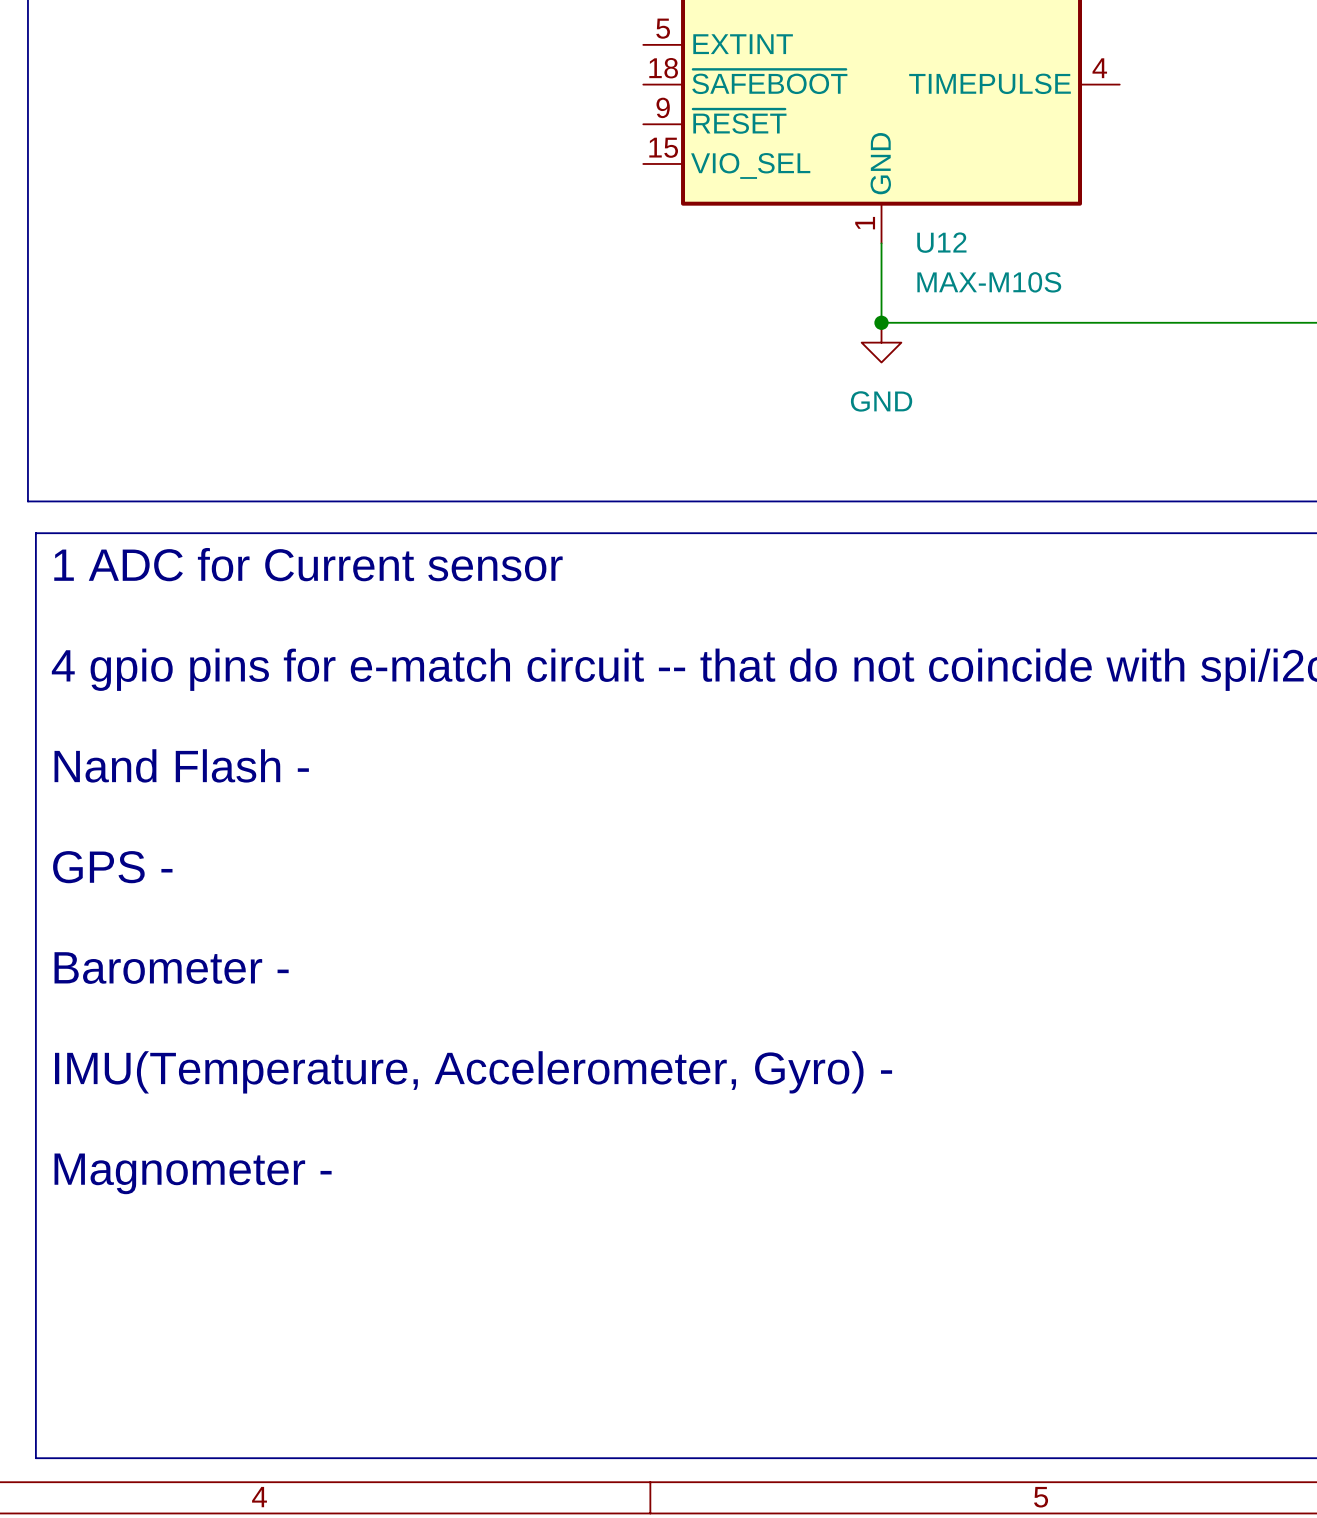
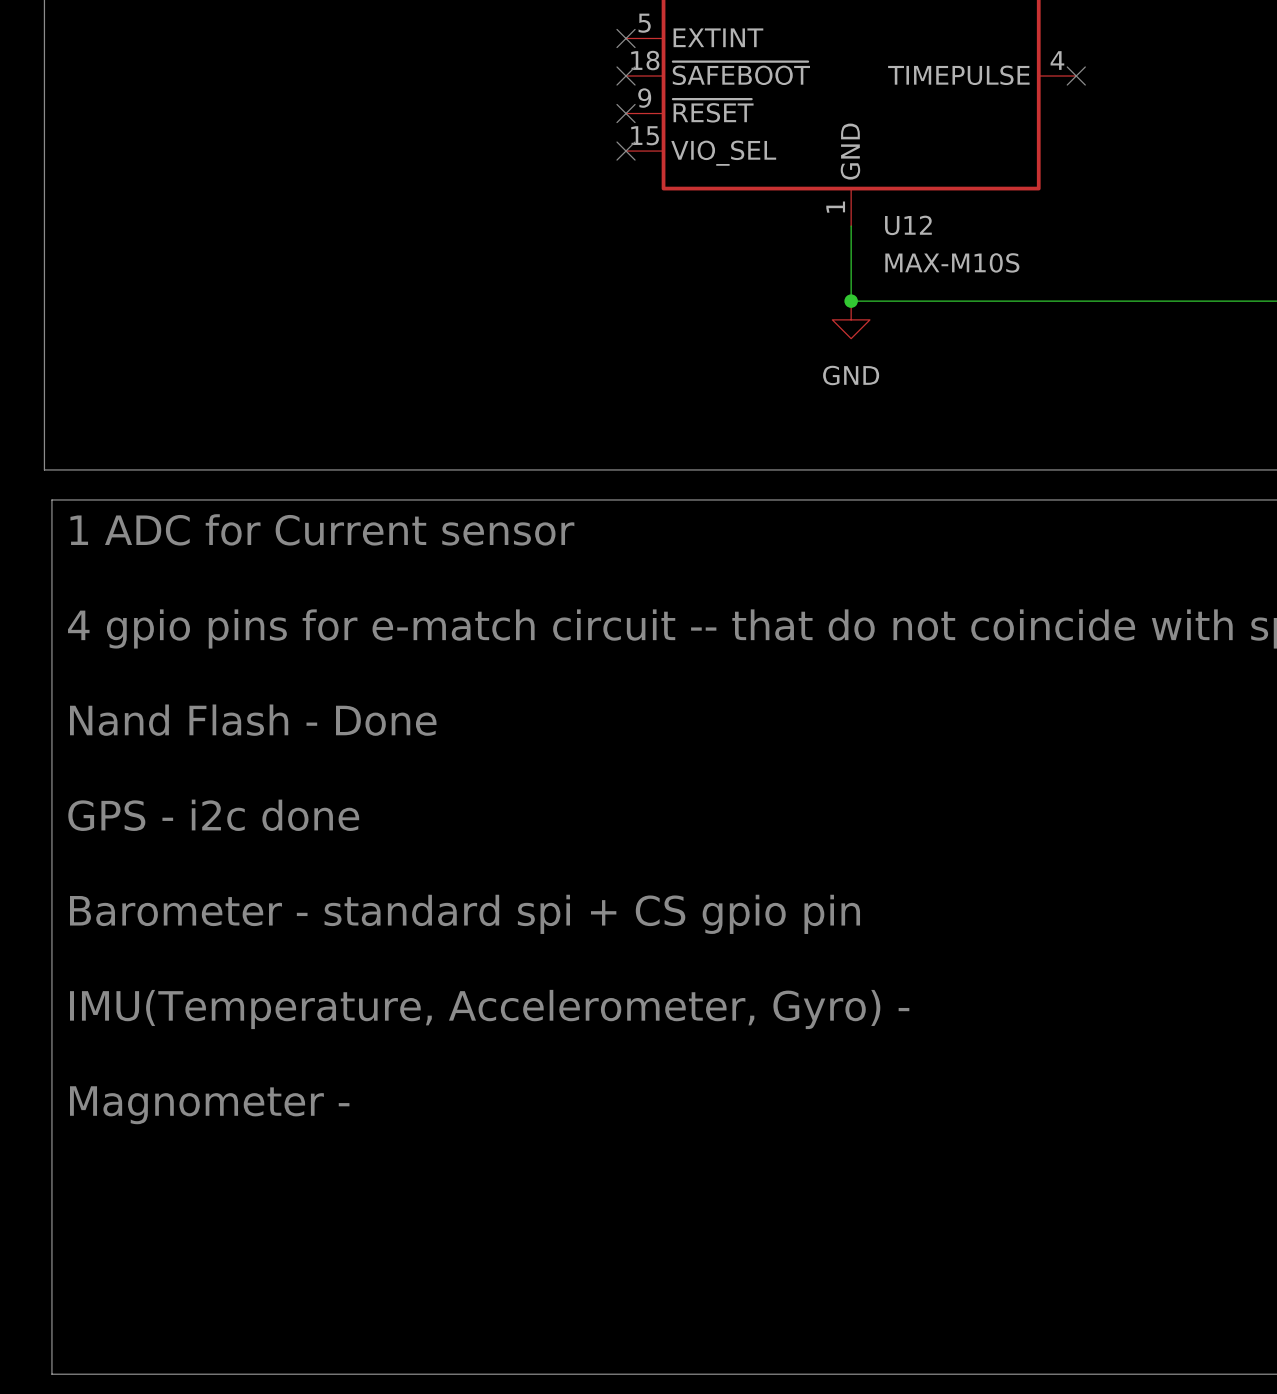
no-connect mark: none -> (626, 38)
no-connect mark: none -> (626, 76)
no-connect mark: none -> (1076, 76)
no-connect mark: none -> (626, 113)
no-connect mark: none -> (626, 151)
text: Nand Flash - (181, 765) -> Nand Flash - Done (253, 720)
text: GPS - (112, 867) -> GPS - i2c done (213, 815)
text: Barometer - (171, 968) -> Barometer - standard spi + CS gpio pin (465, 914)

